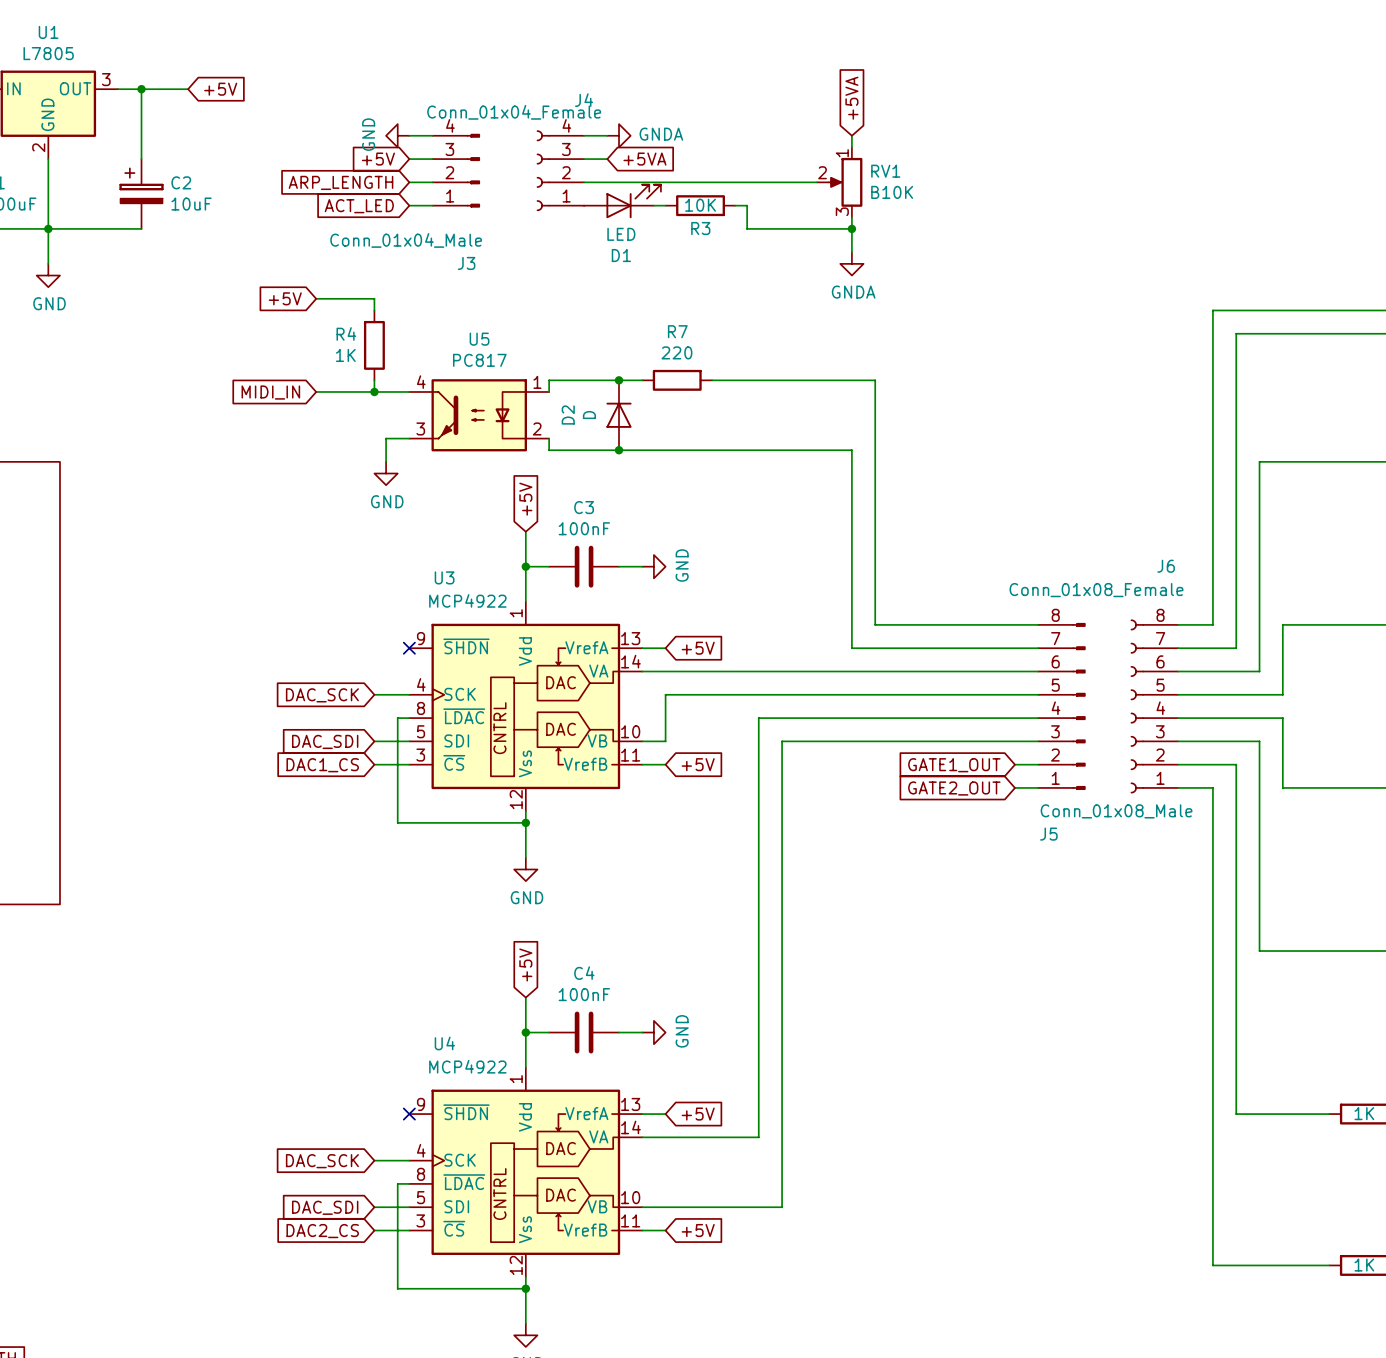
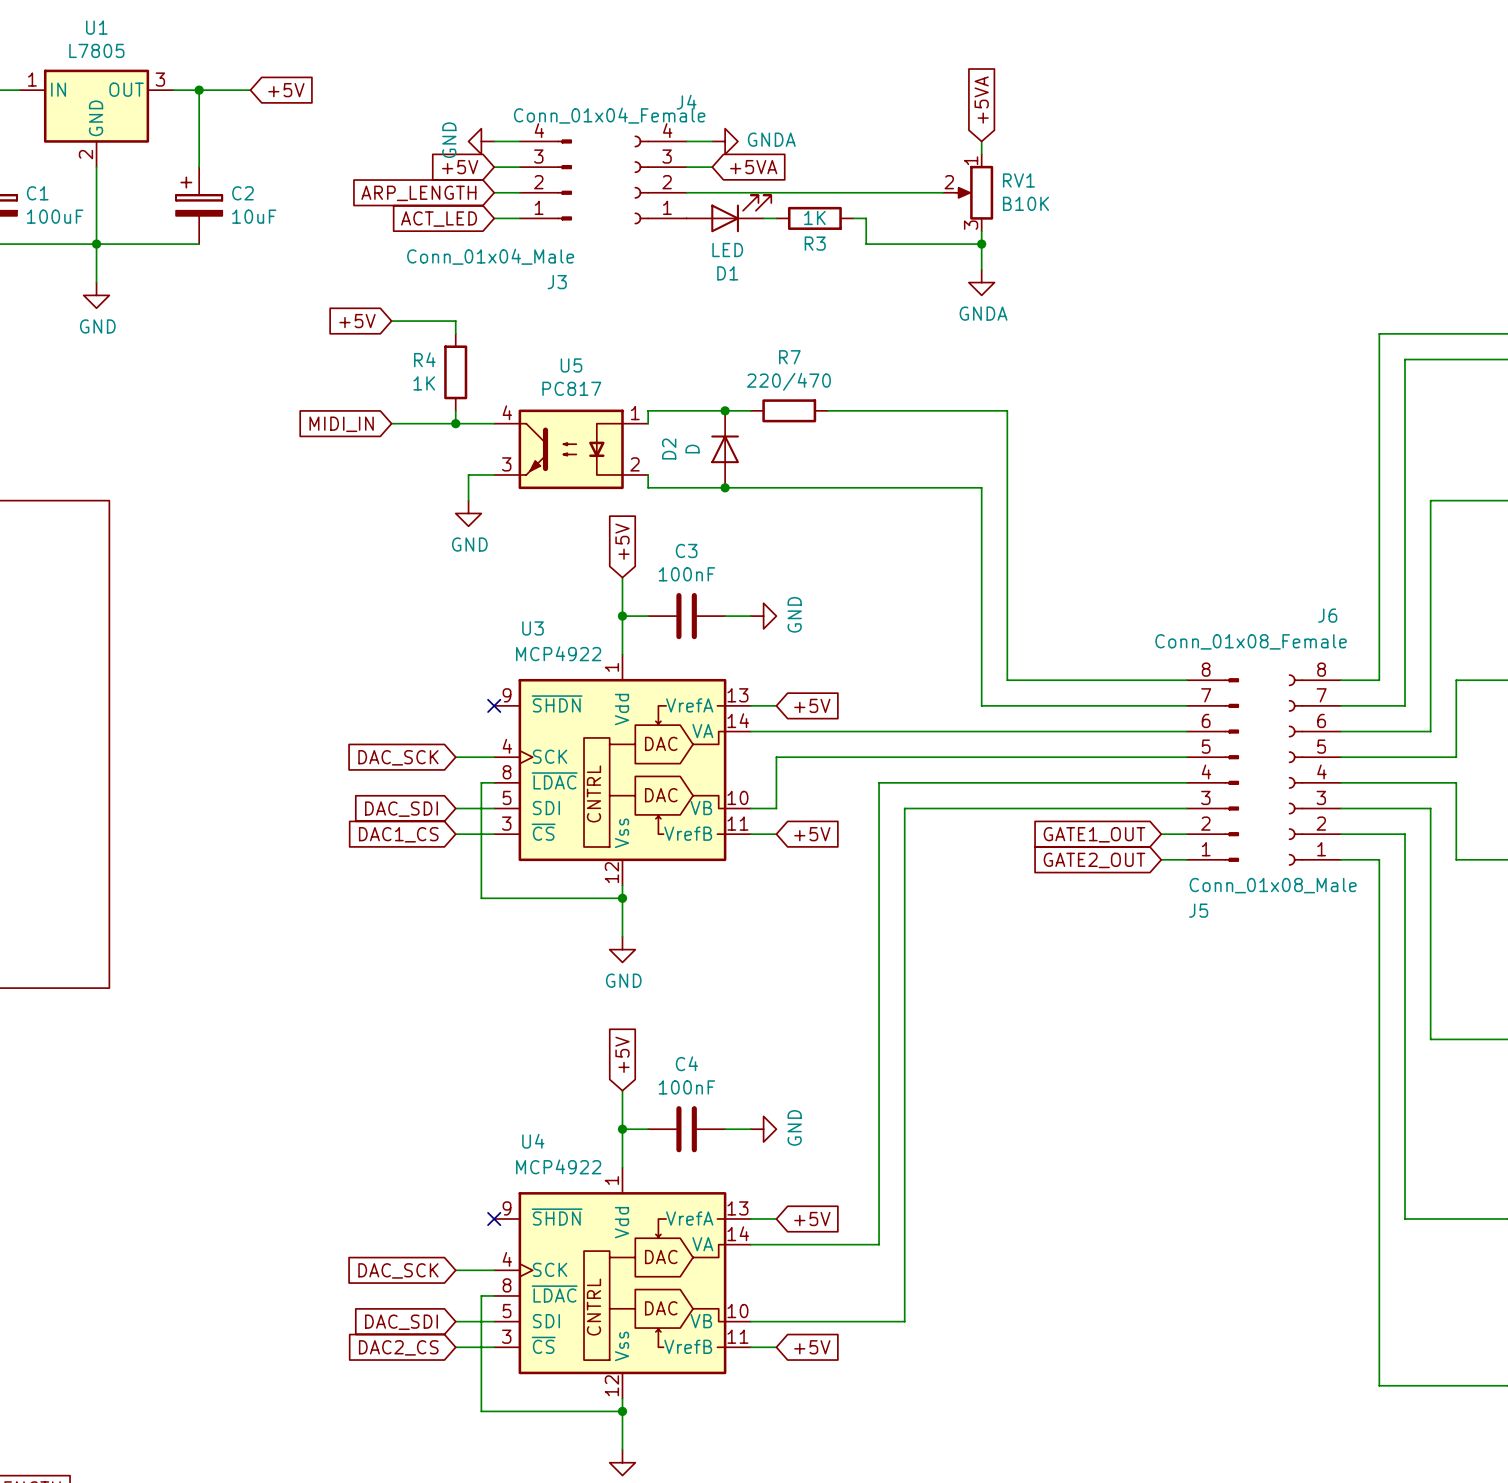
R3 value: 10K (700, 205) -> 1K (814, 217)
R7 value: 220 (676, 352) -> 220/470 (788, 381)

